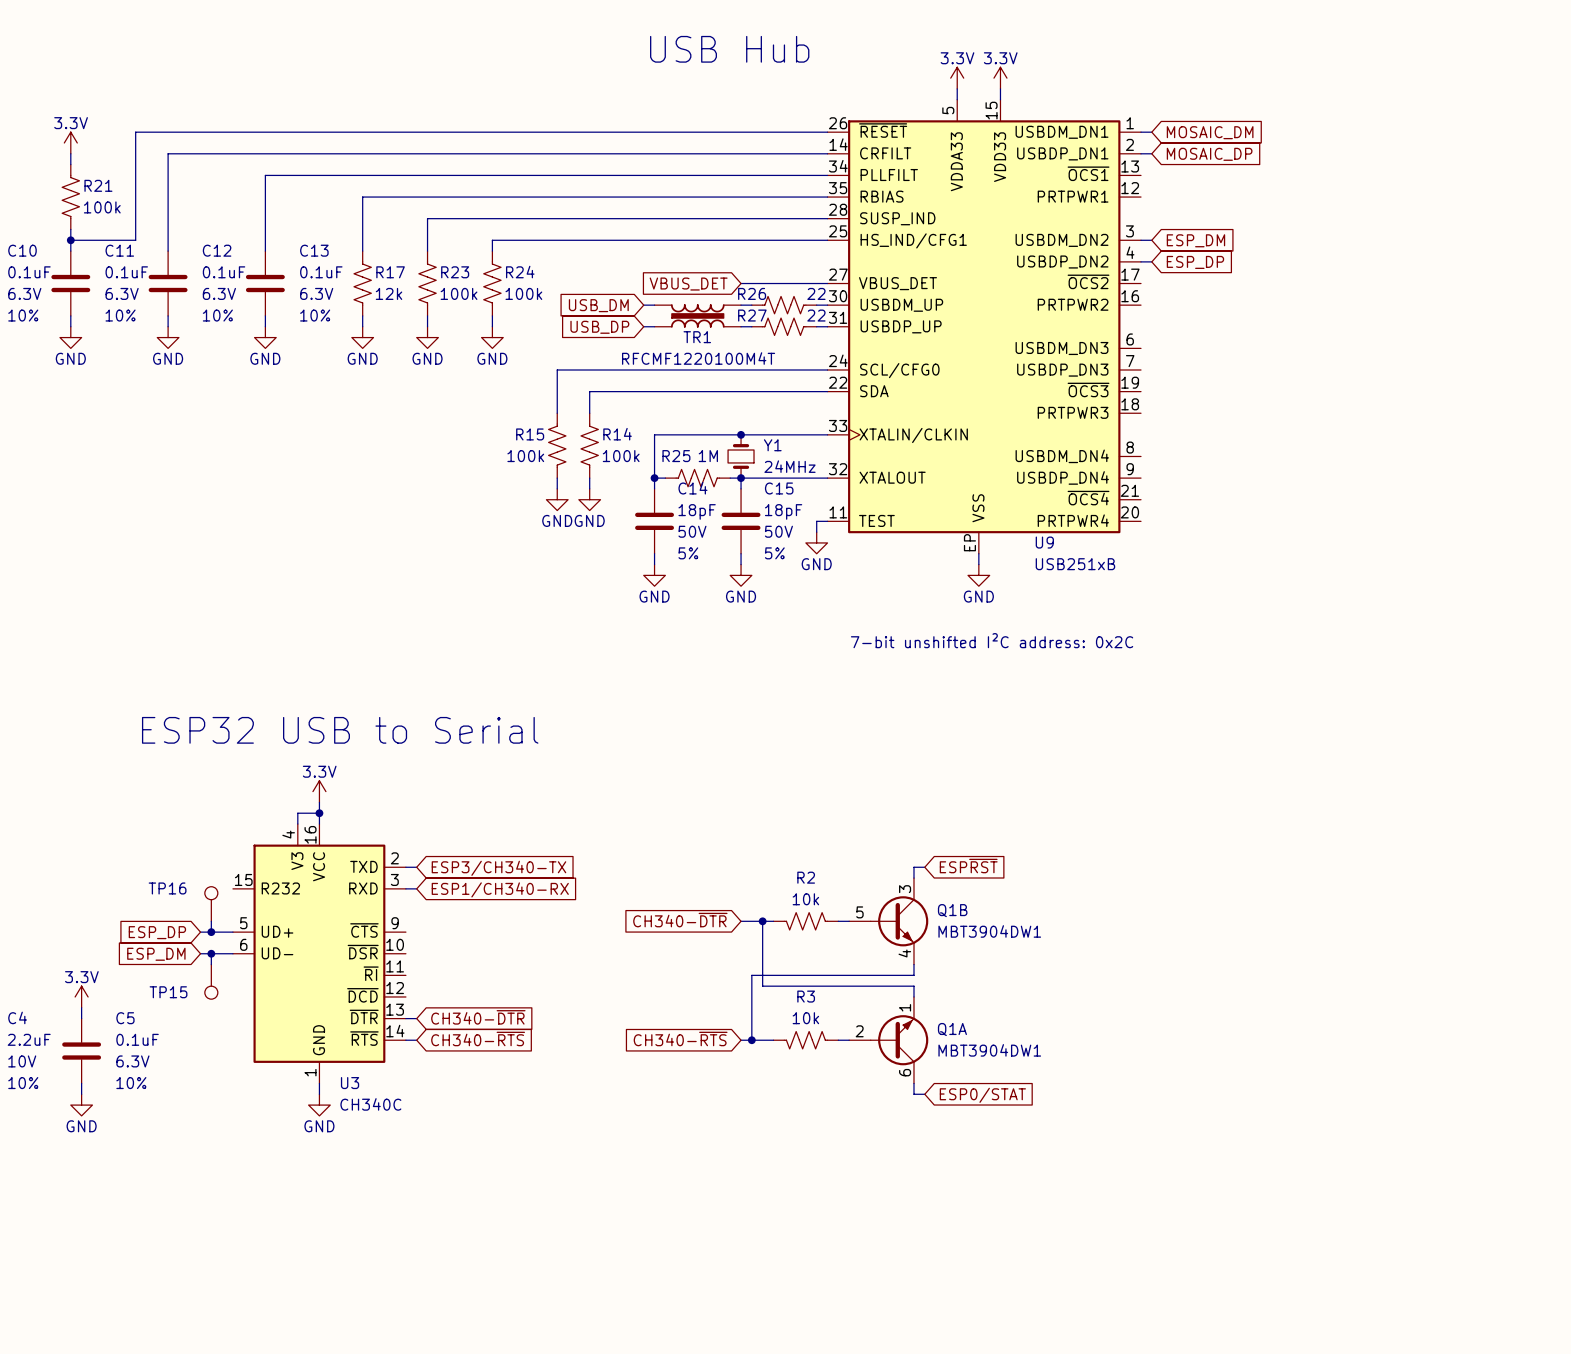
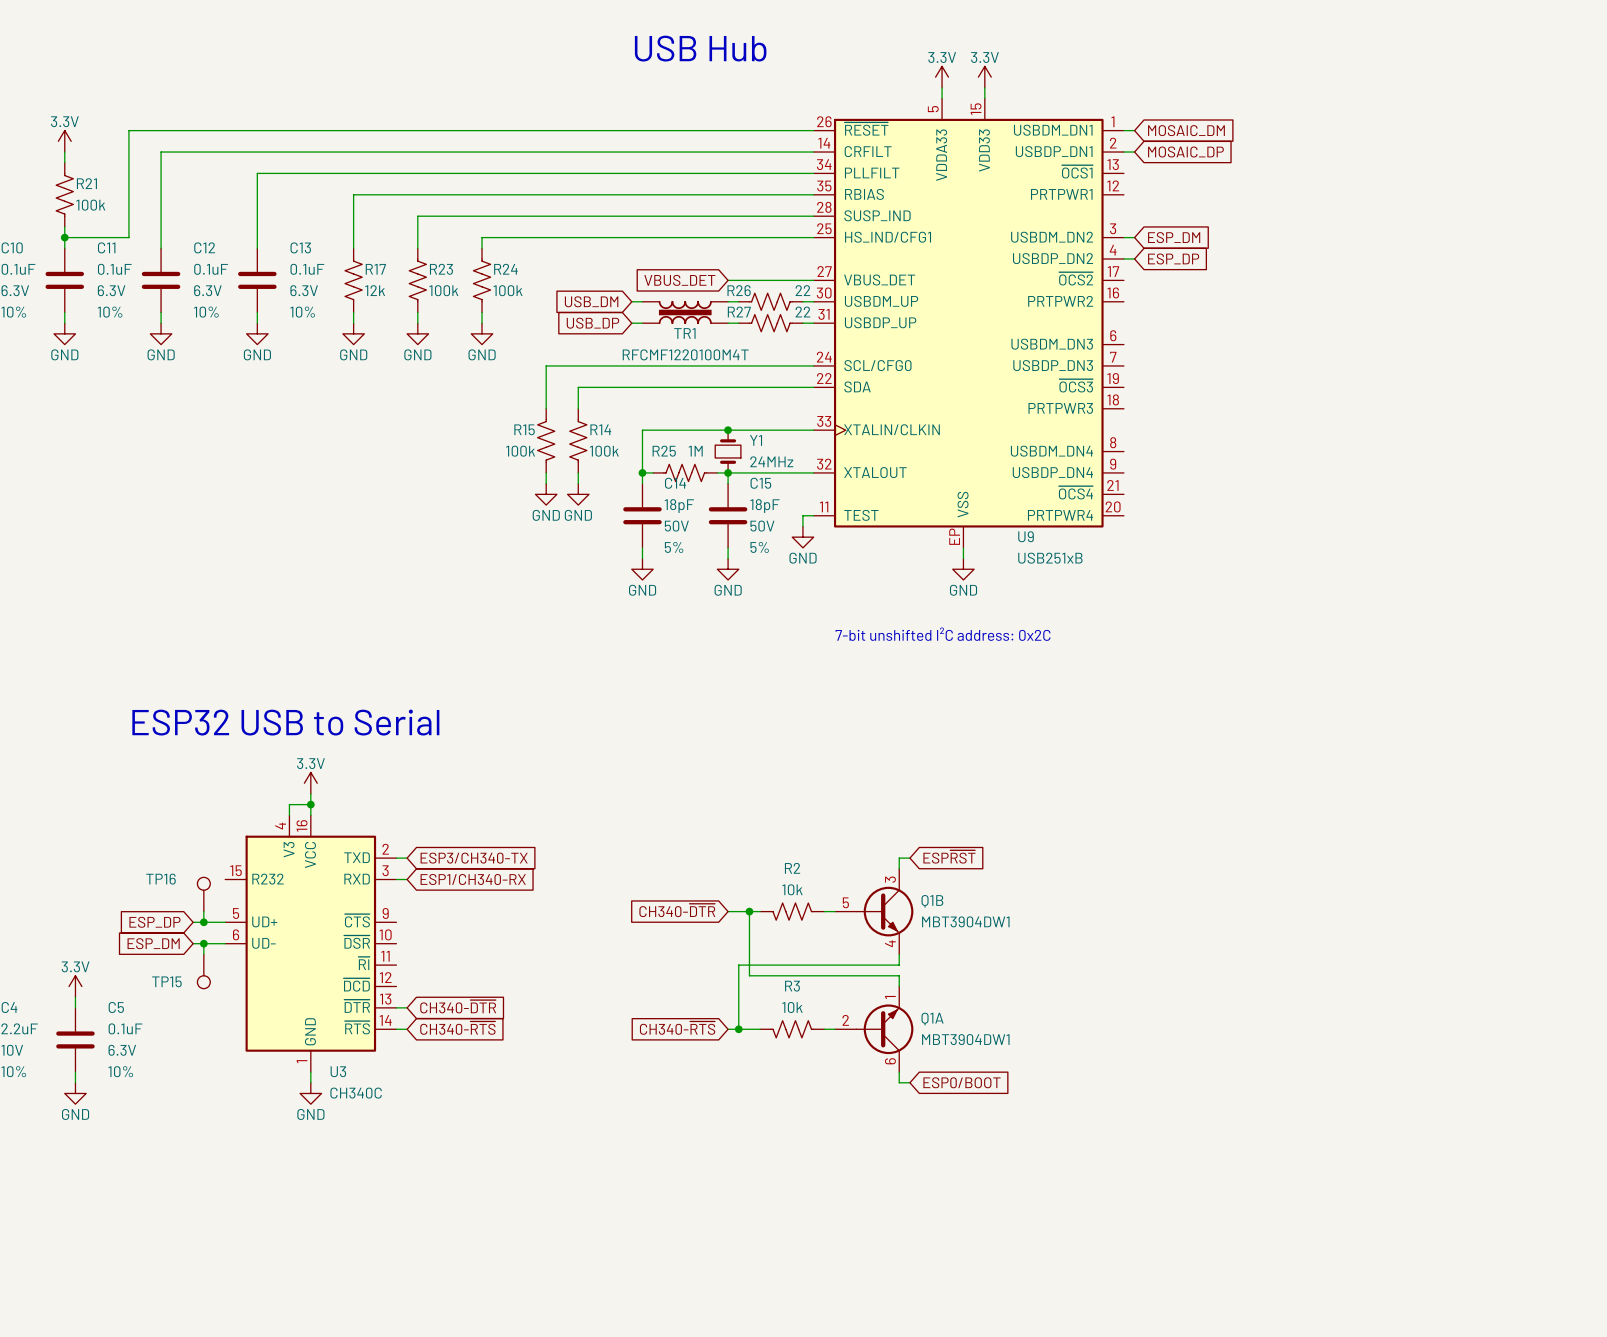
global label: ESP0/STAT (982, 1095) -> ESP0/BOOT (961, 1082)

